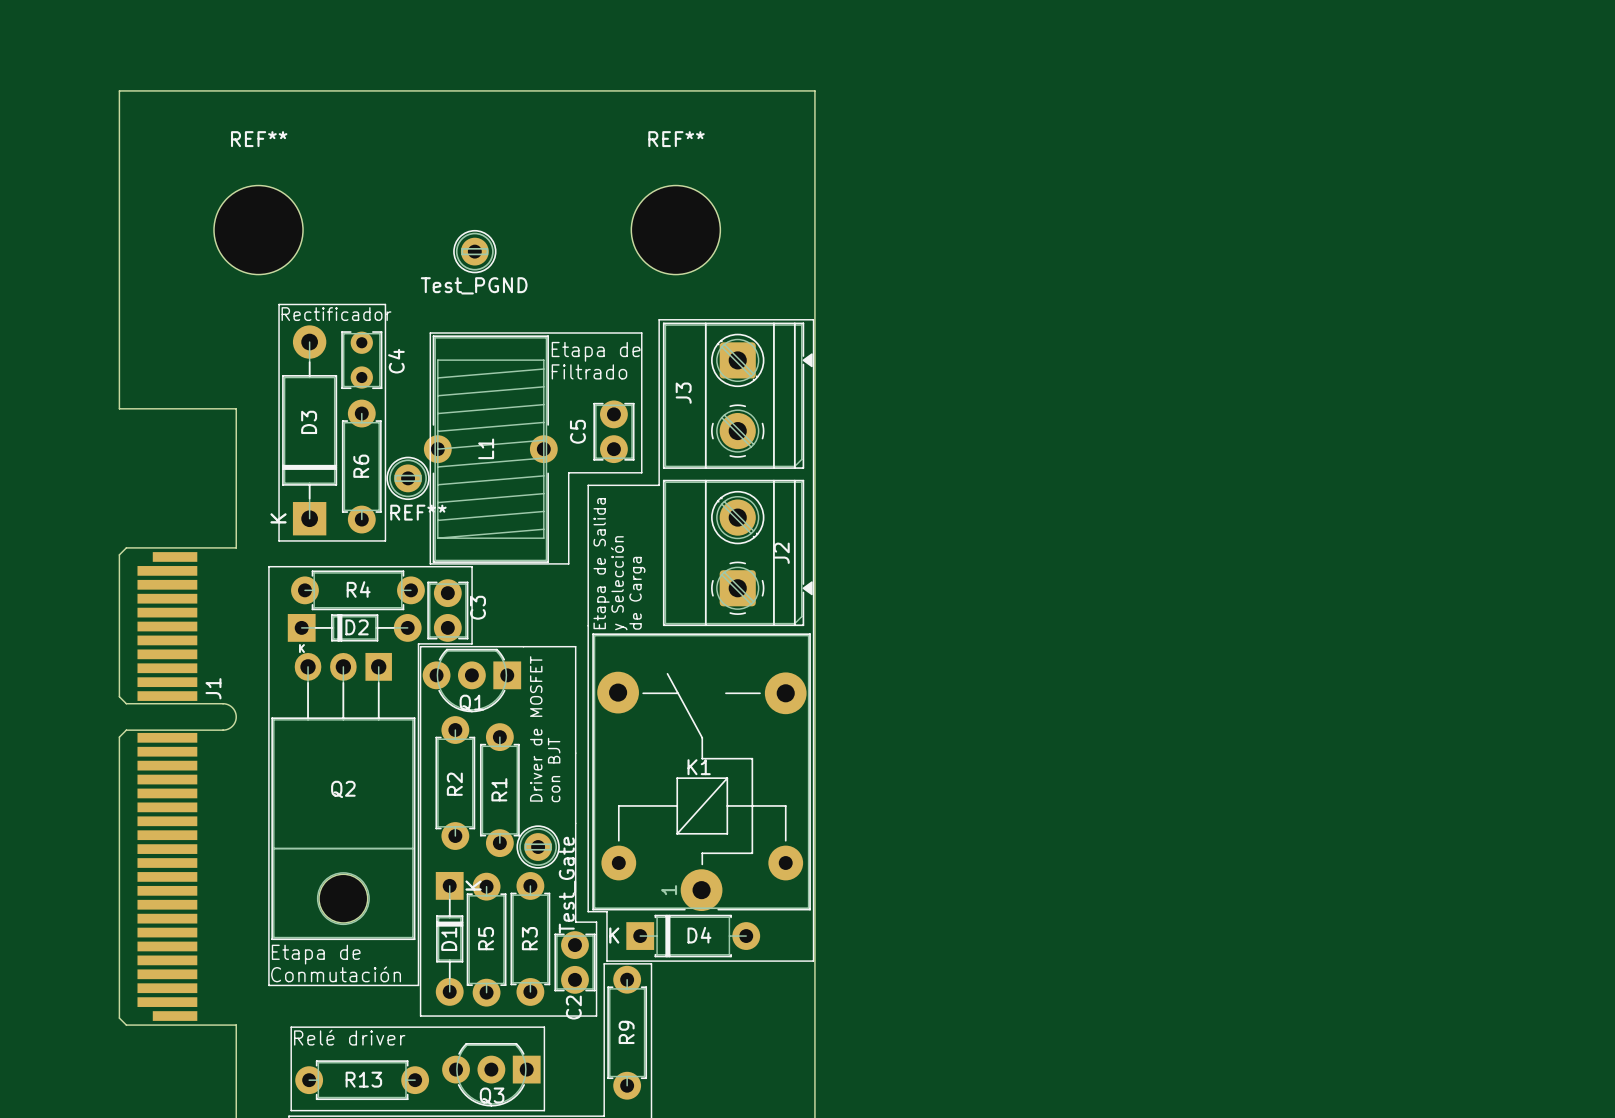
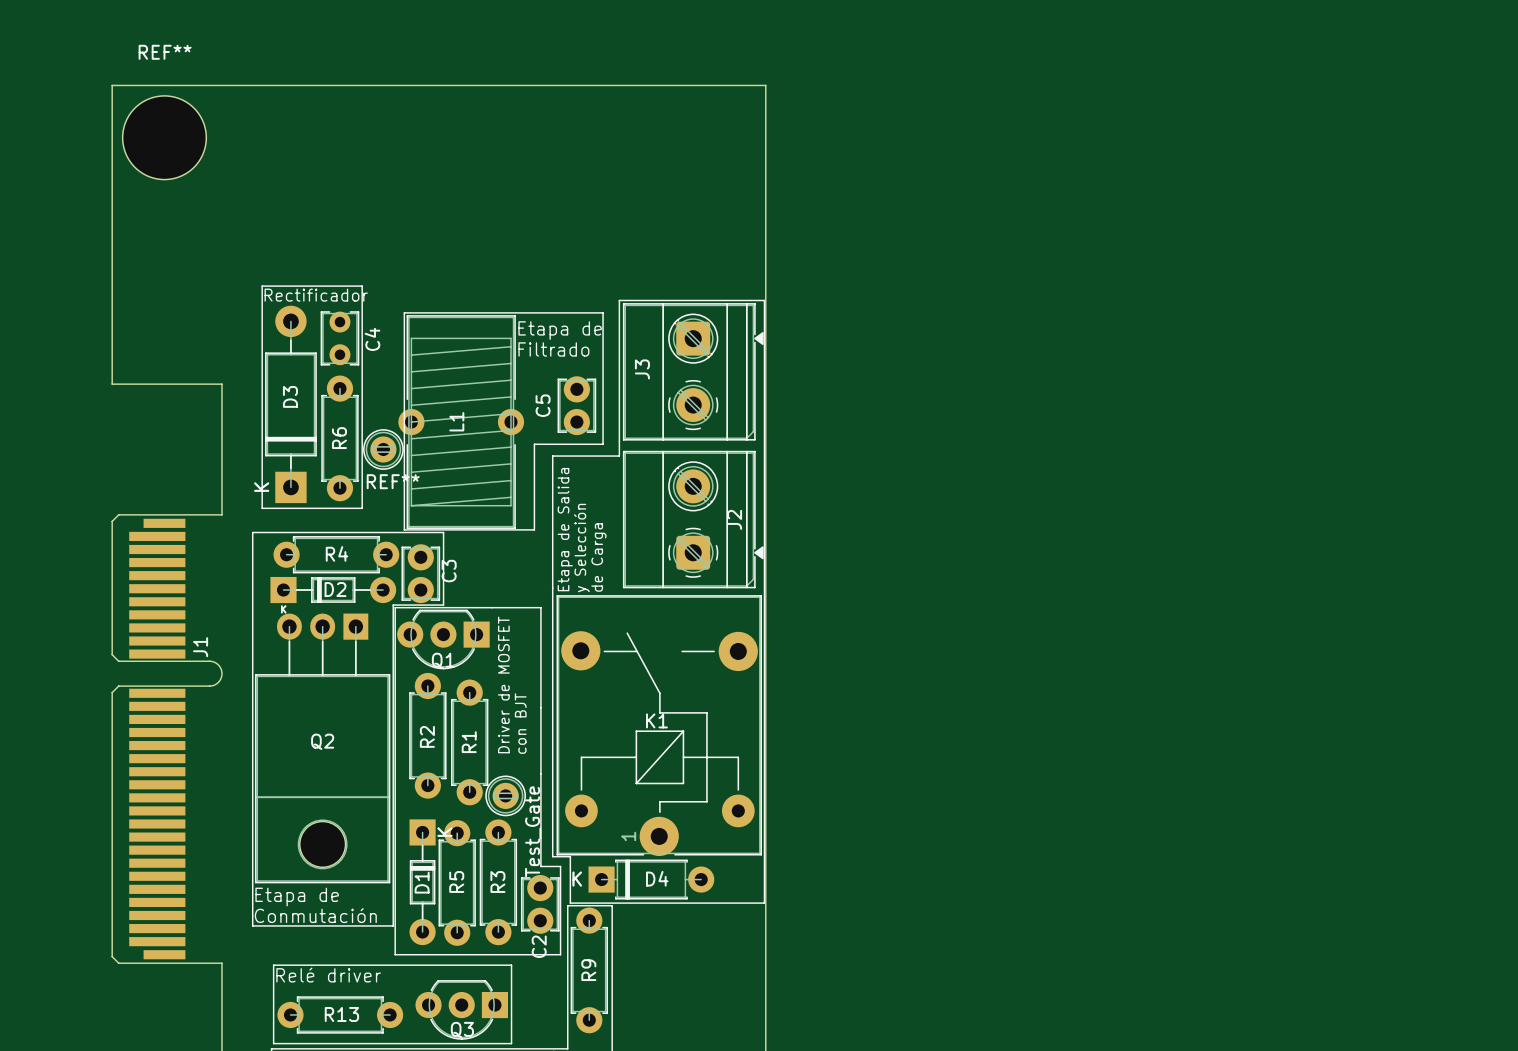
REF** position: (258, 230) -> (164, 137)
REF**: (675, 230) -> none
Test_PGND: (474, 251) -> none

